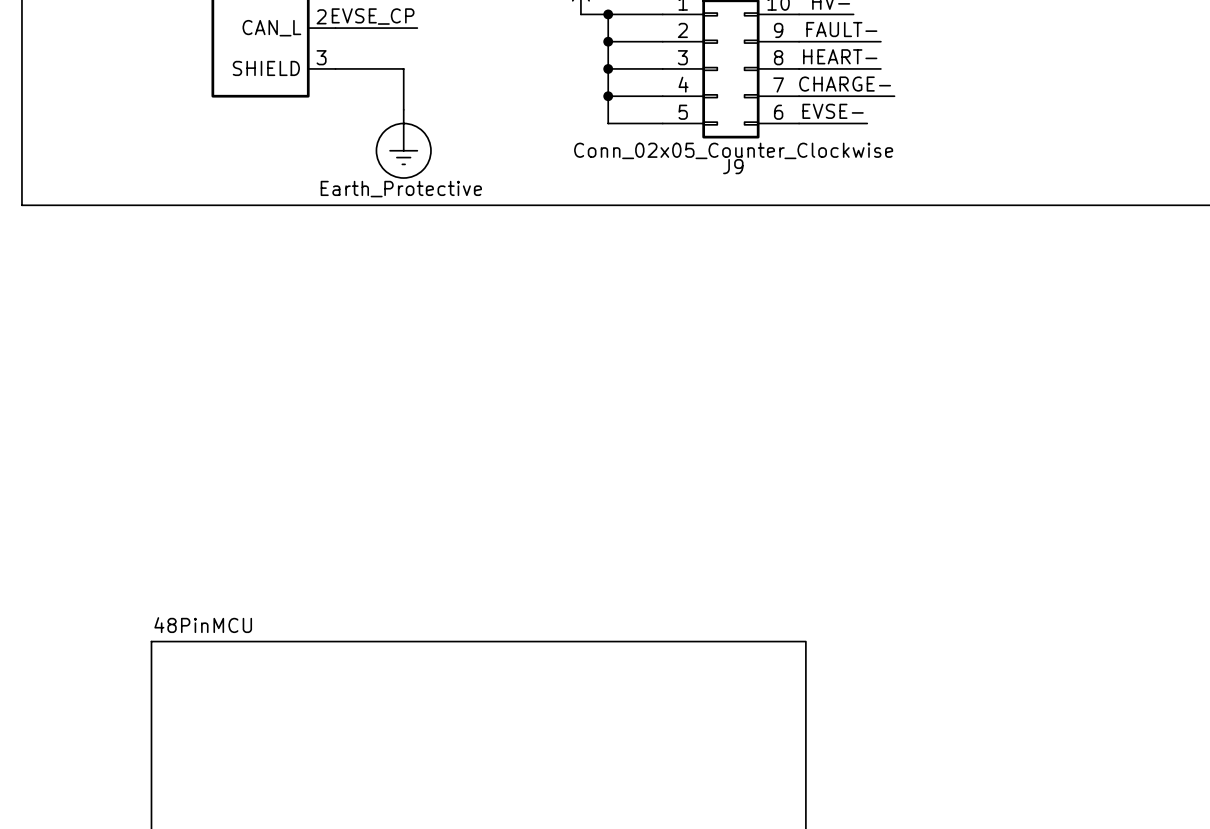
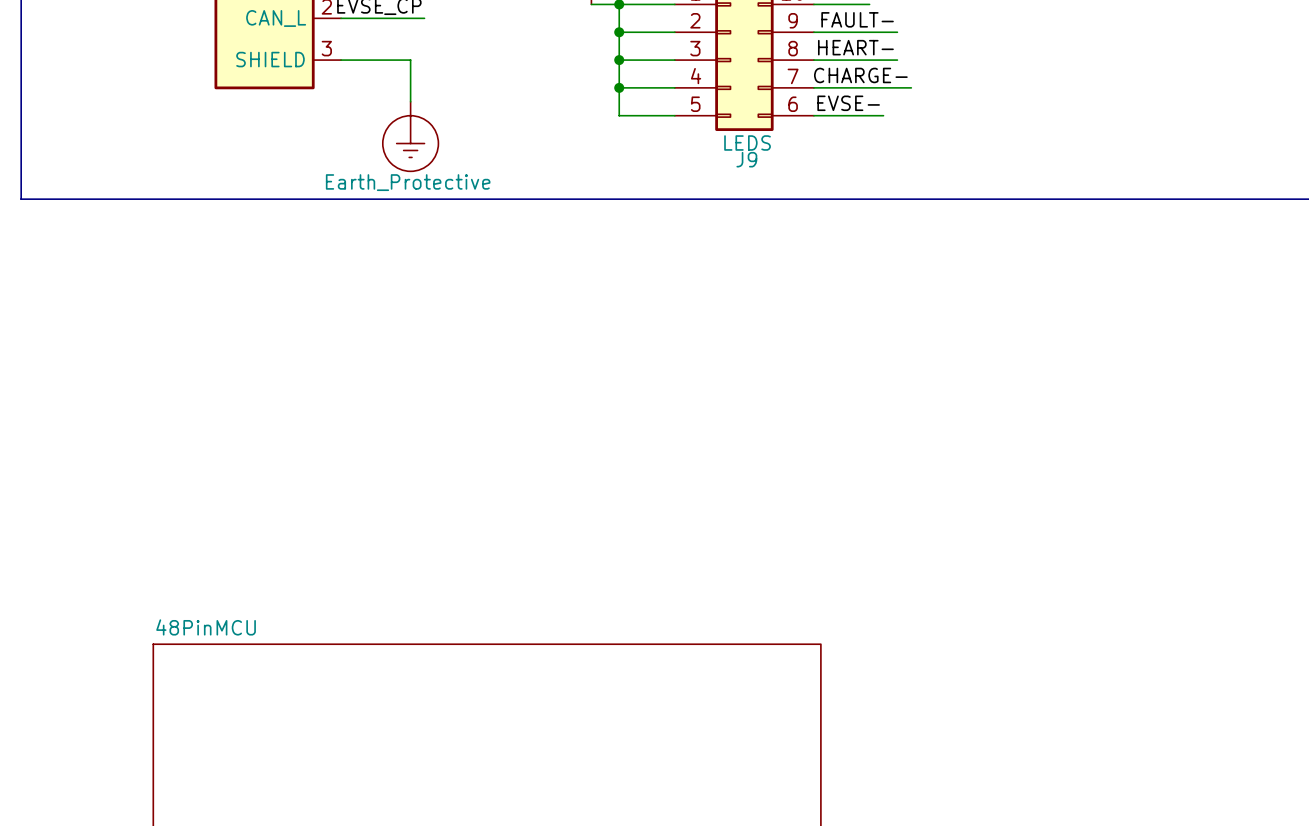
J9 value: Conn_02x05_Counter_Clockwise (733, 150) -> LEDS (747, 143)

